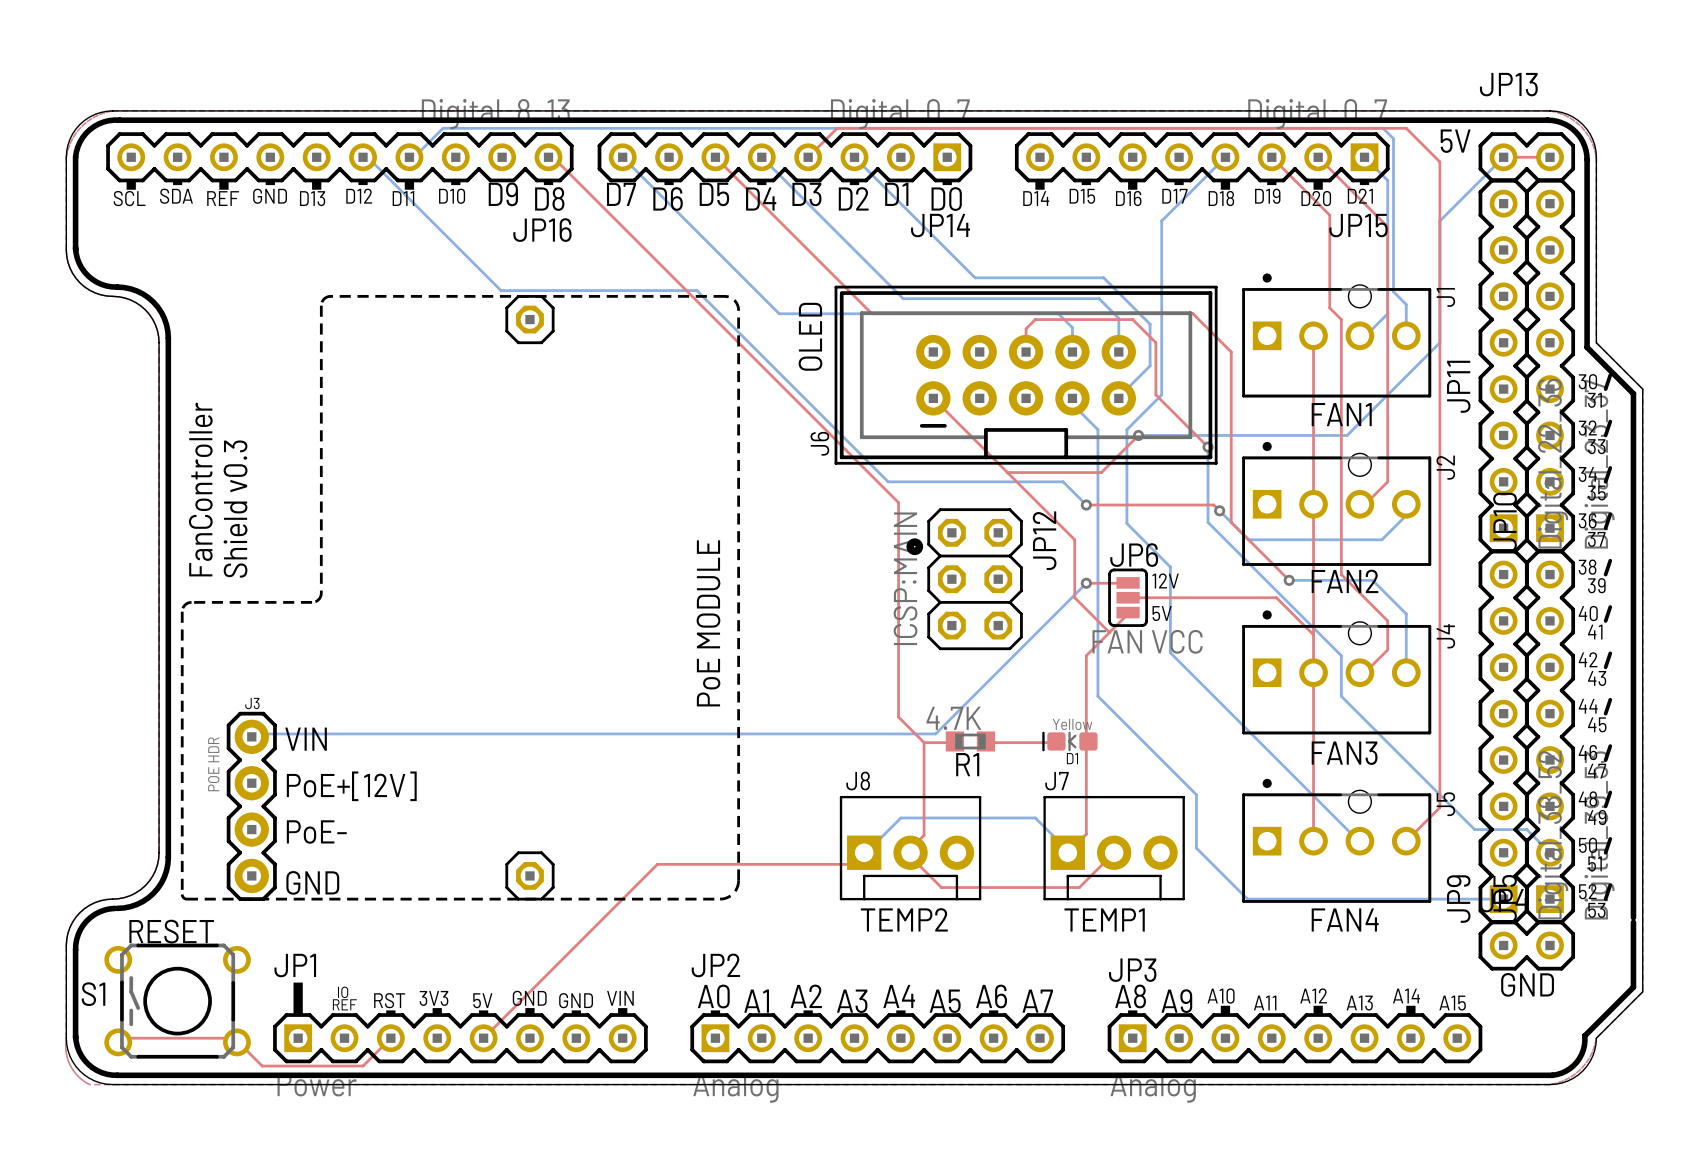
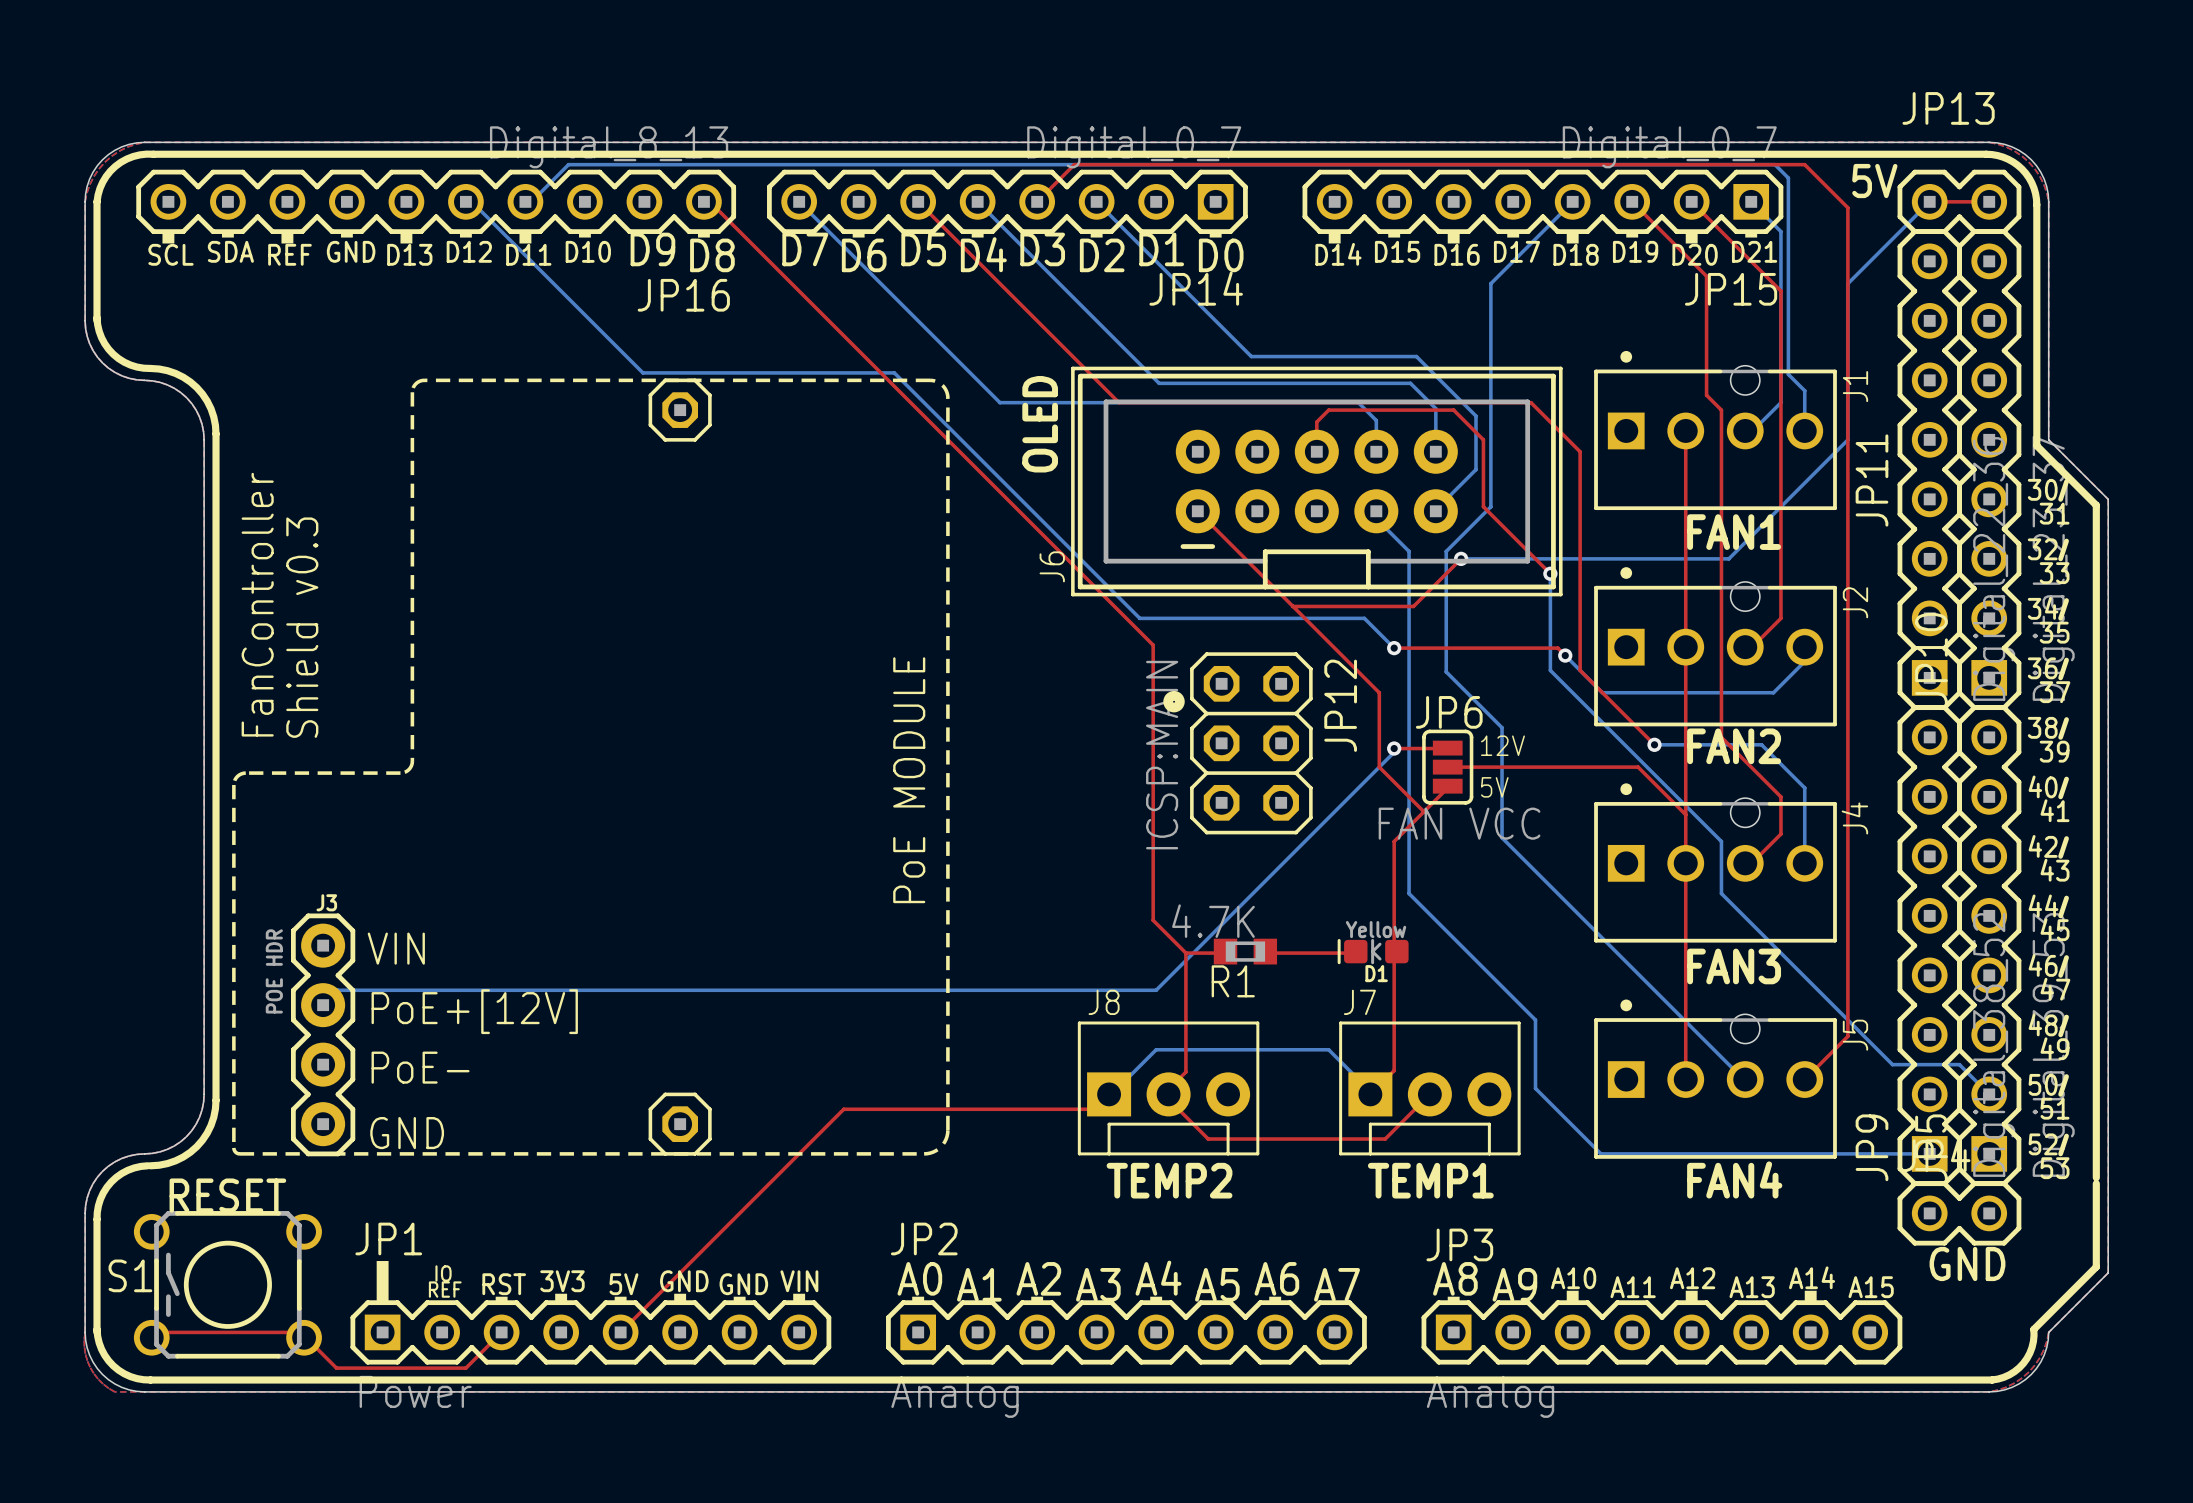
bottom track: (1086, 583) (935, 733) (251, 733) (251, 736) -> none
bottom track: none -> (1394, 752) (1156, 990) (338, 990)

